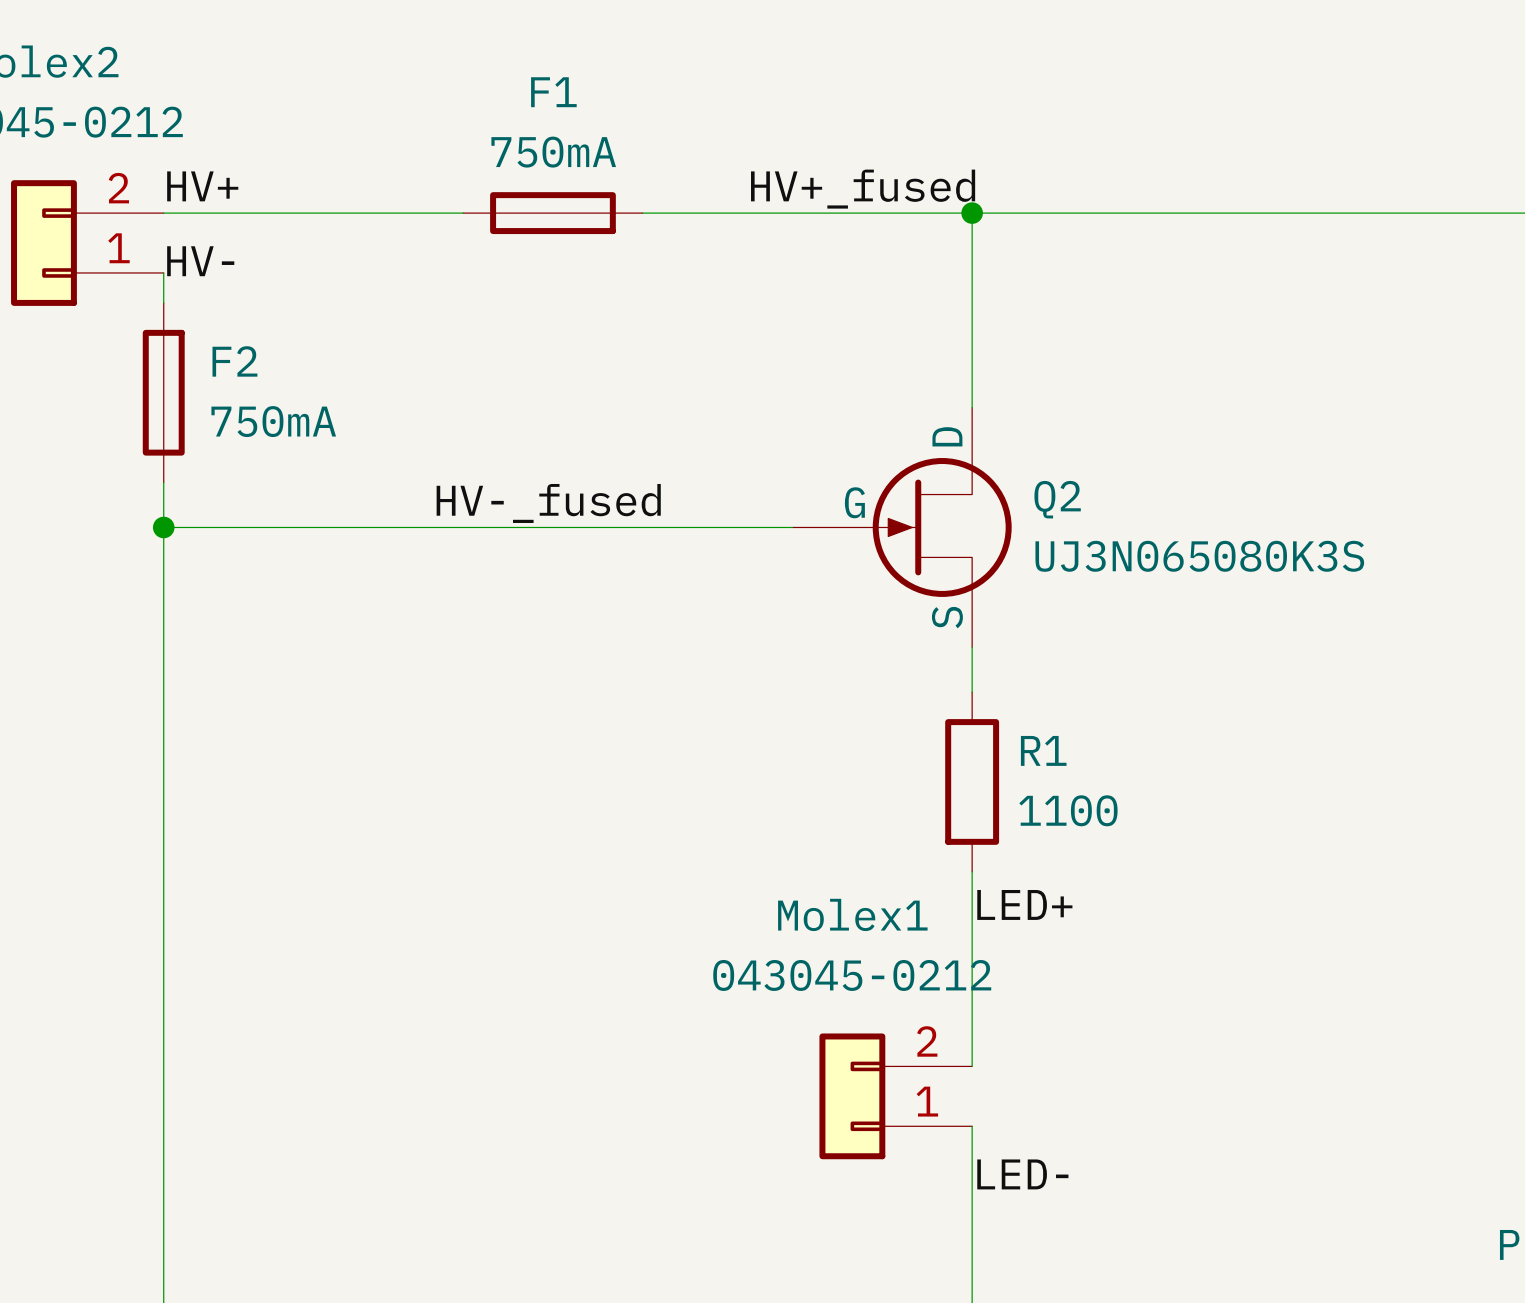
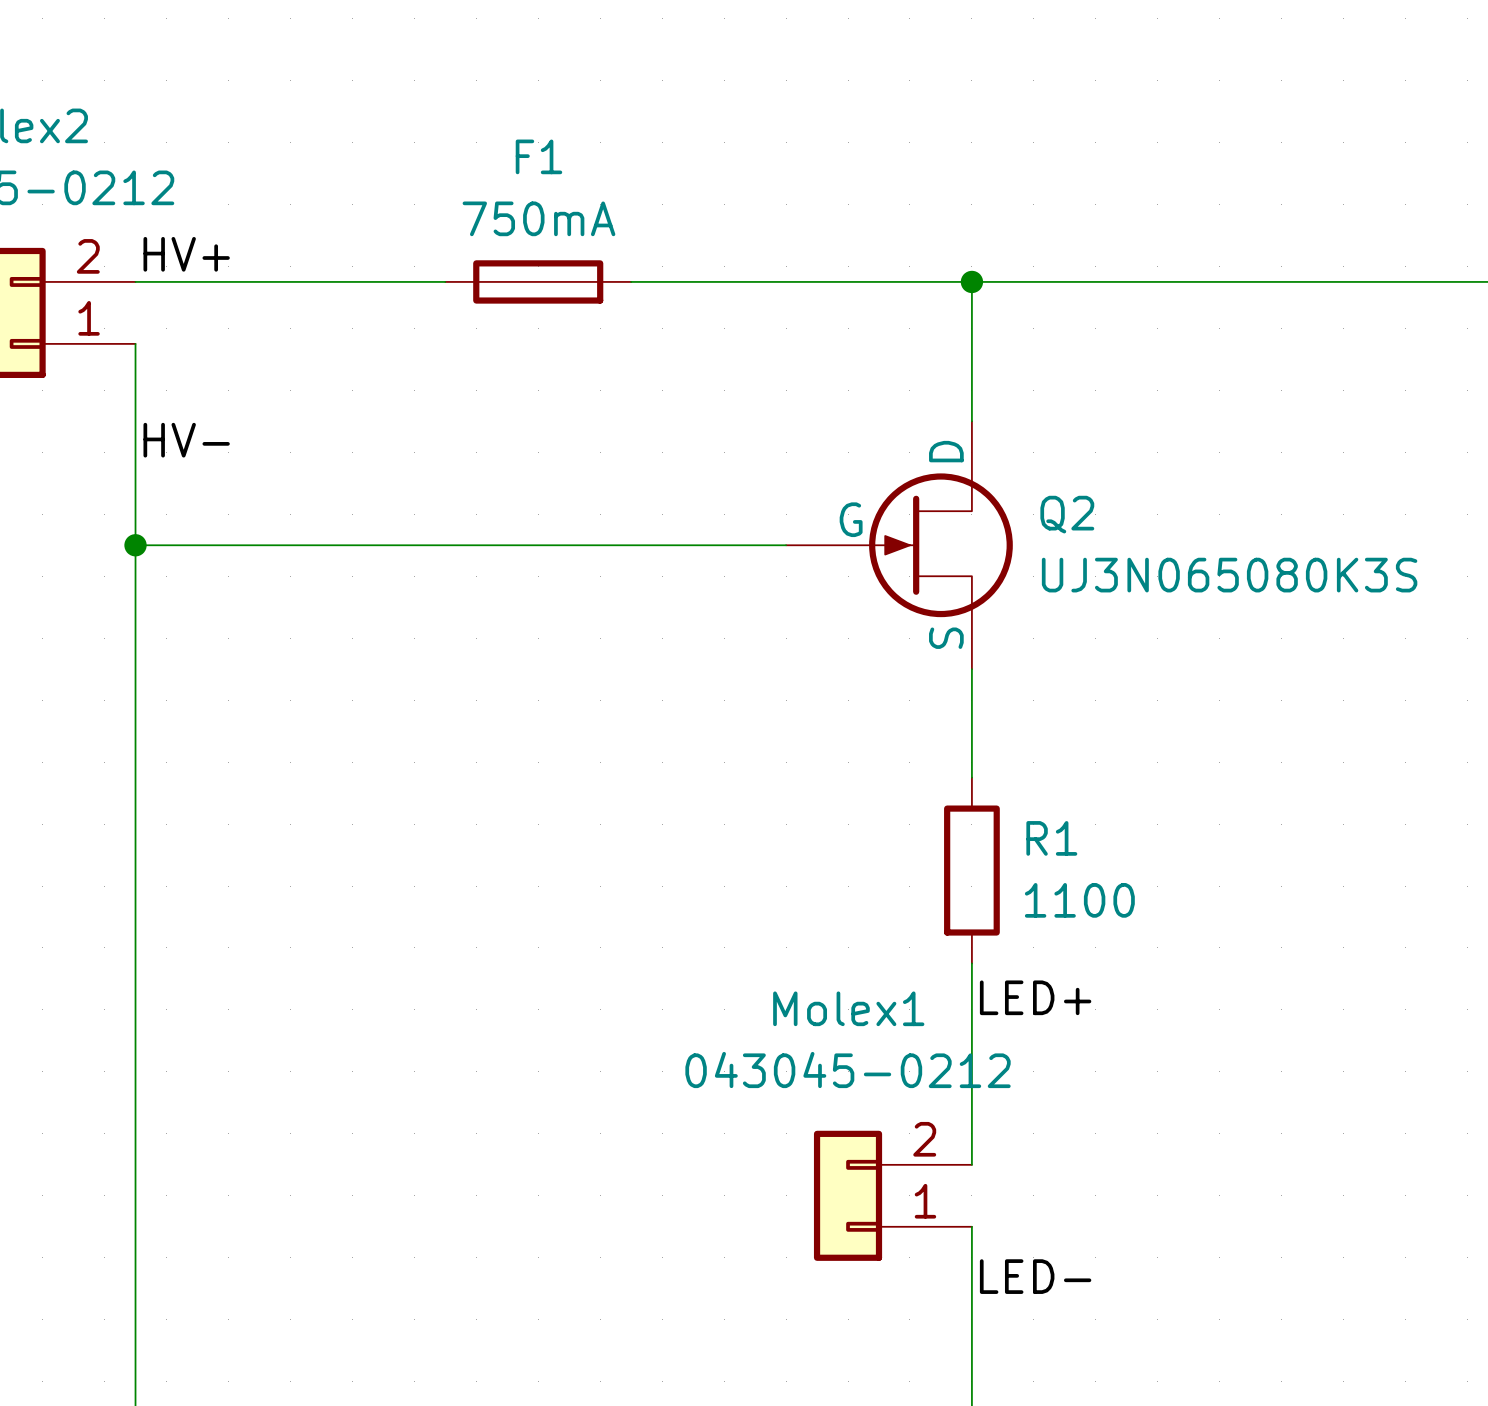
label: HV+_fused (863, 189) -> none
label position: HV- (200, 261) -> HV- (186, 440)
F2: 750mA (163, 392) -> none
label: HV-_fused (548, 503) -> none
wire: (163, 527) (792, 527) -> (135, 545) (786, 545)
junction position: (163, 527) -> (135, 545)
Q2 position: (902, 527) -> (899, 545)

